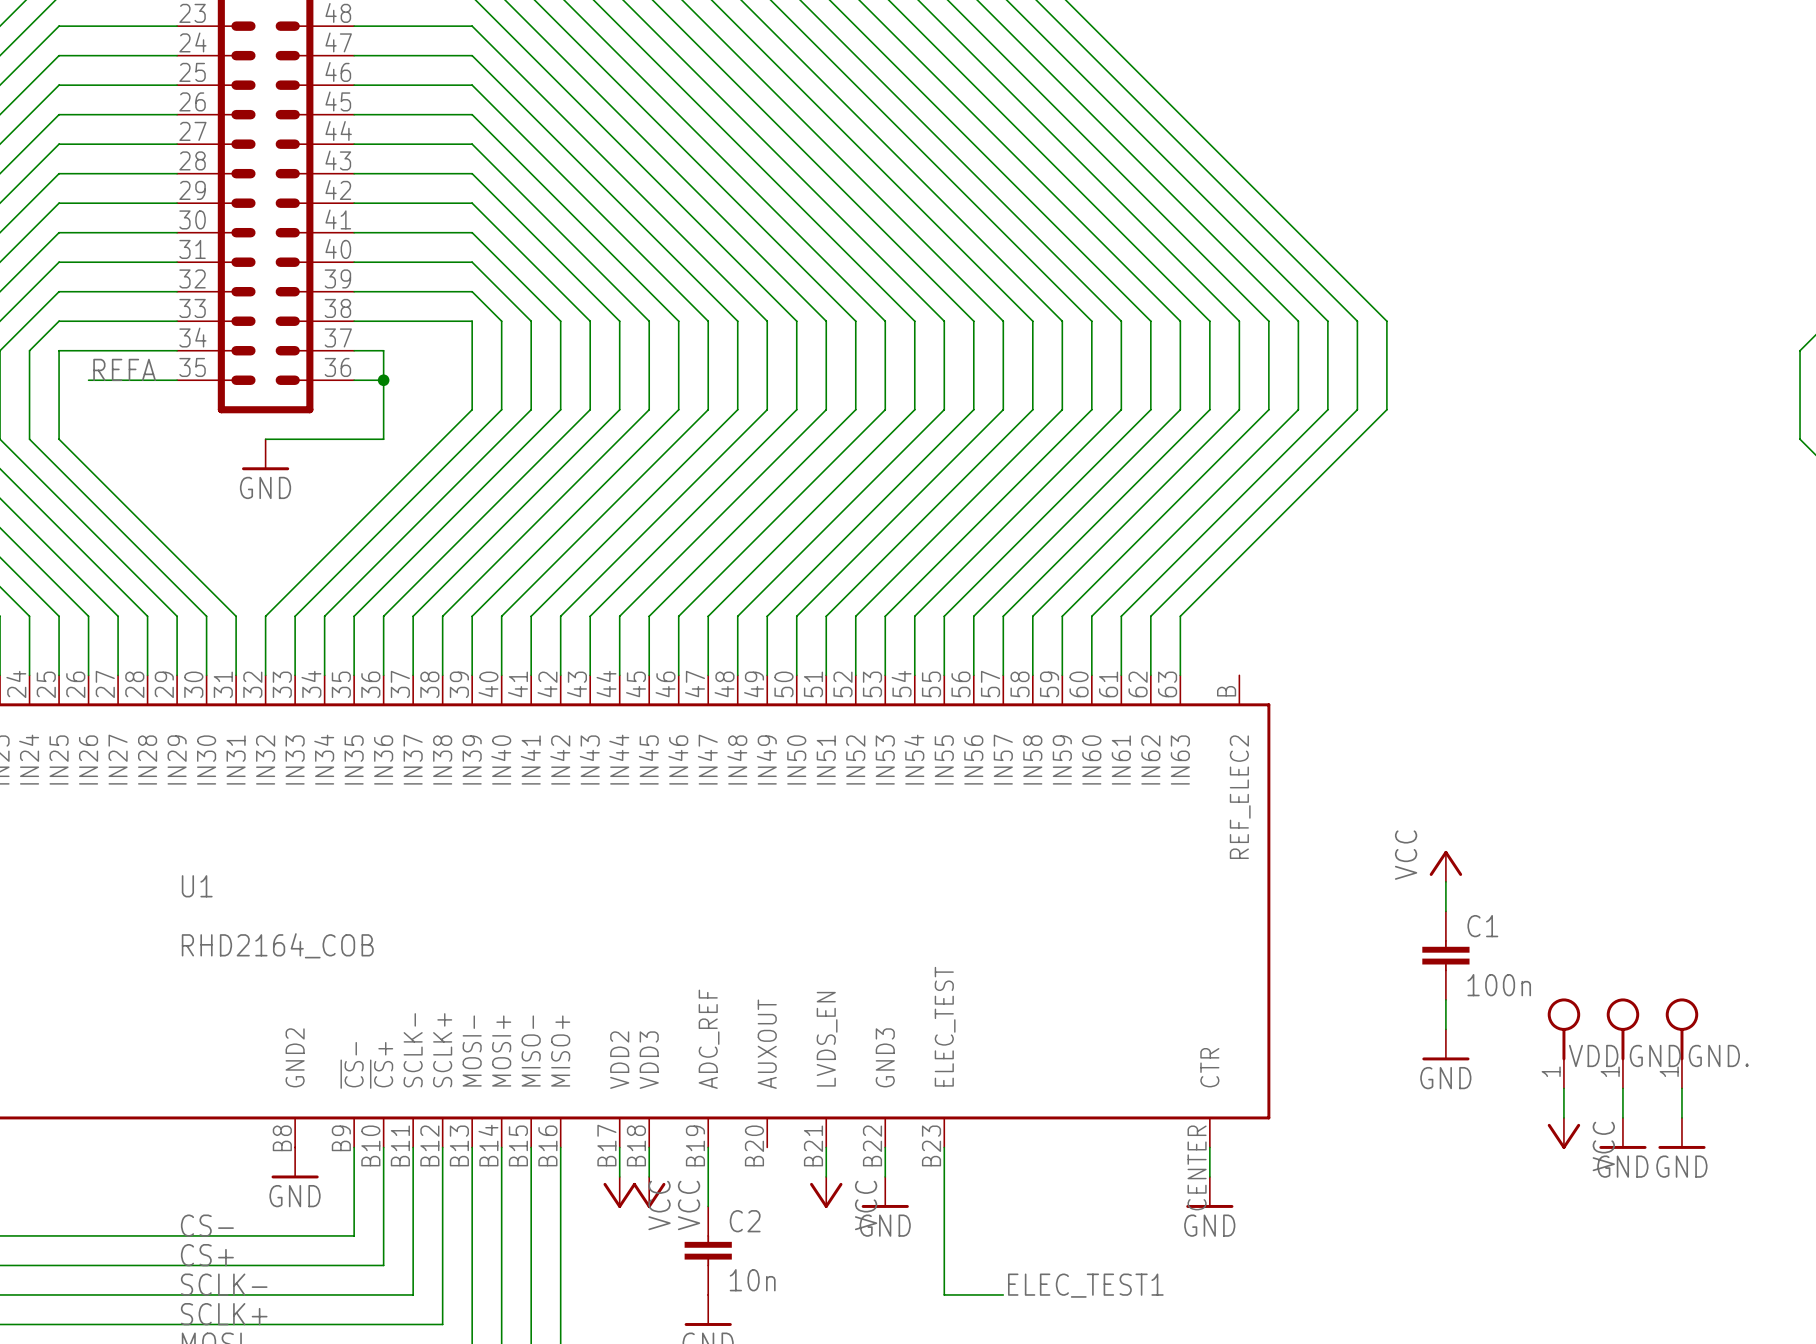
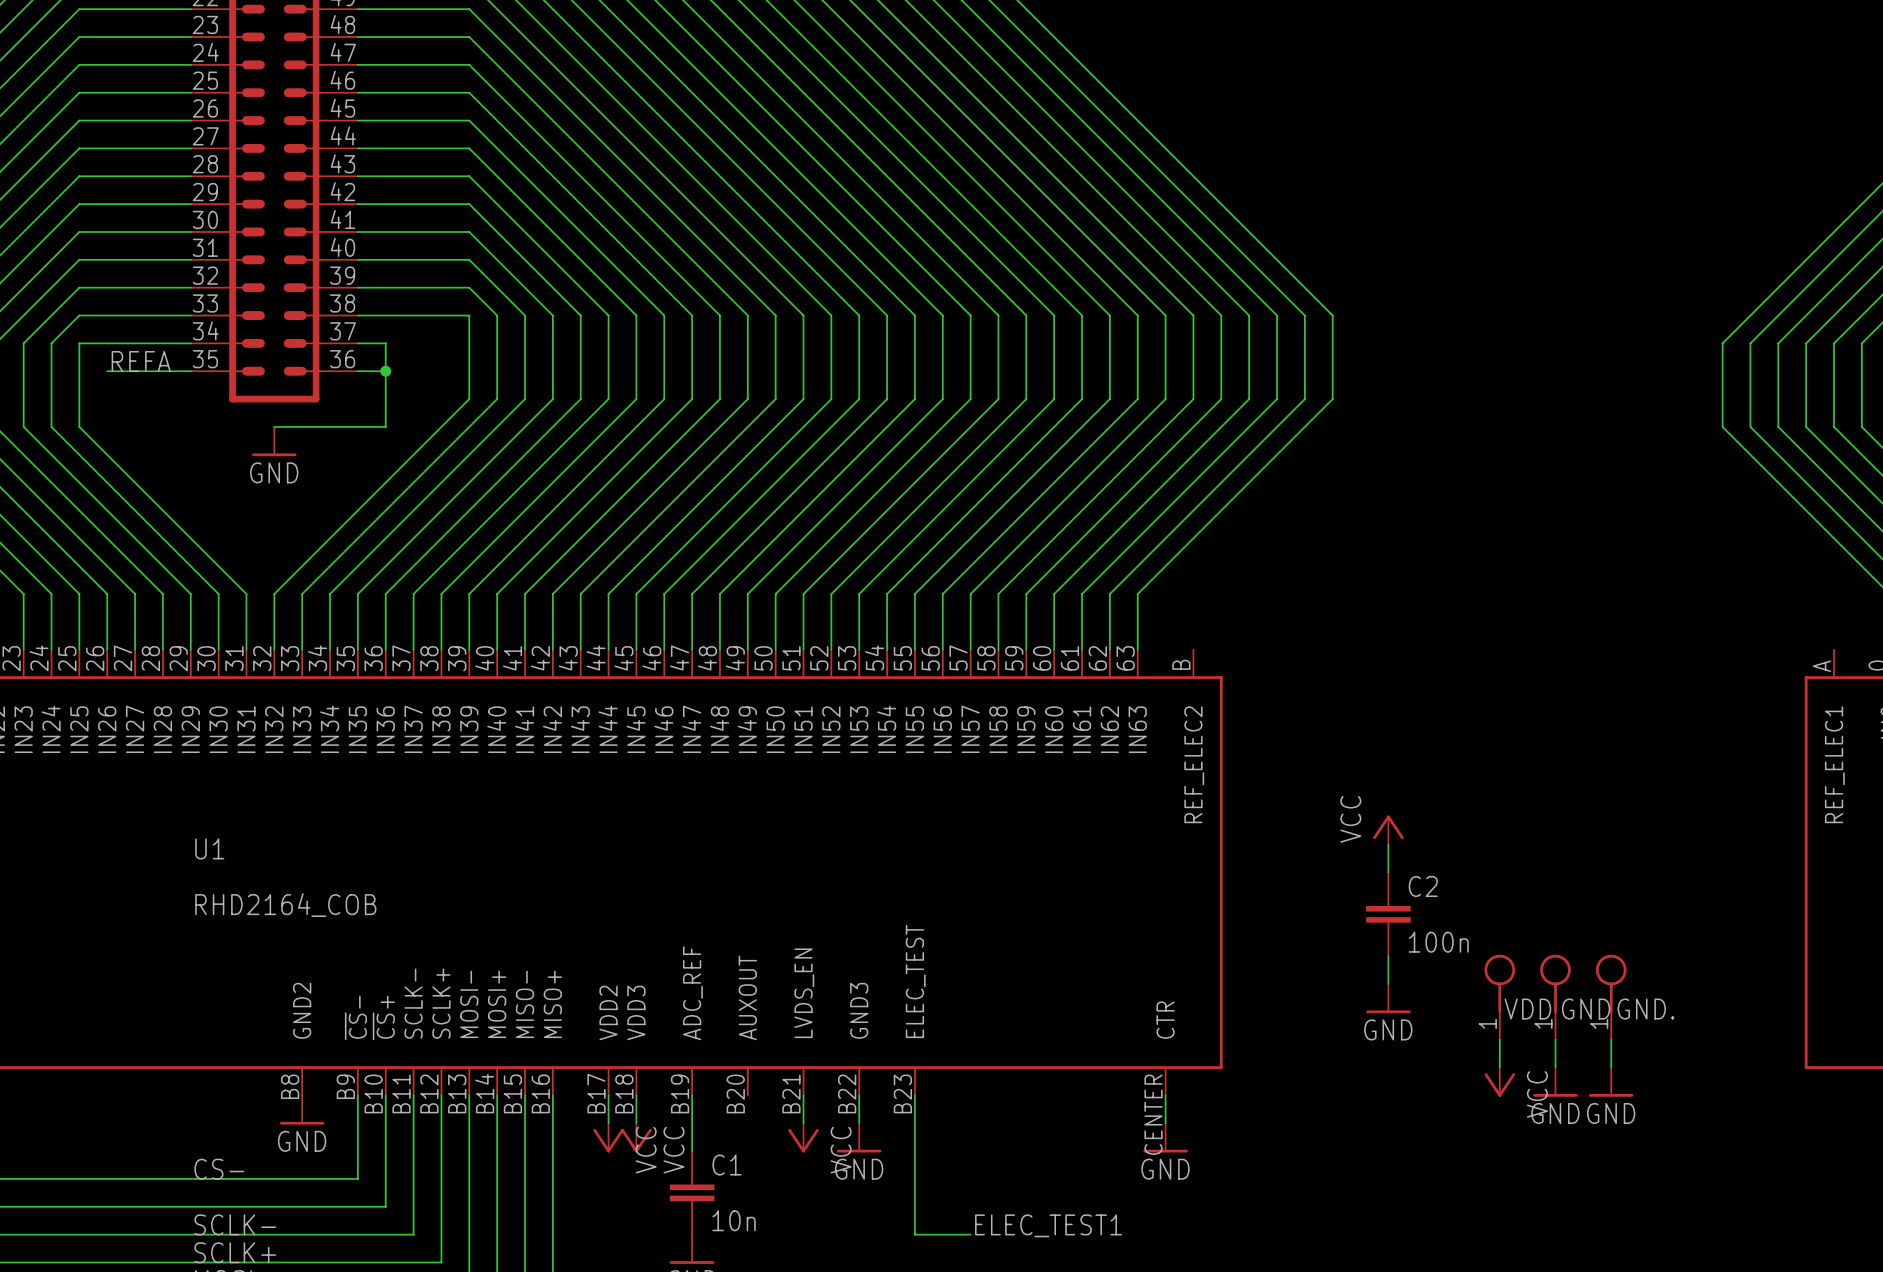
C1 name: C1 (1482, 926) -> C2 (1423, 886)
C2 name: C2 (745, 1221) -> C1 (726, 1165)
label: CS+ (207, 1255) -> none

